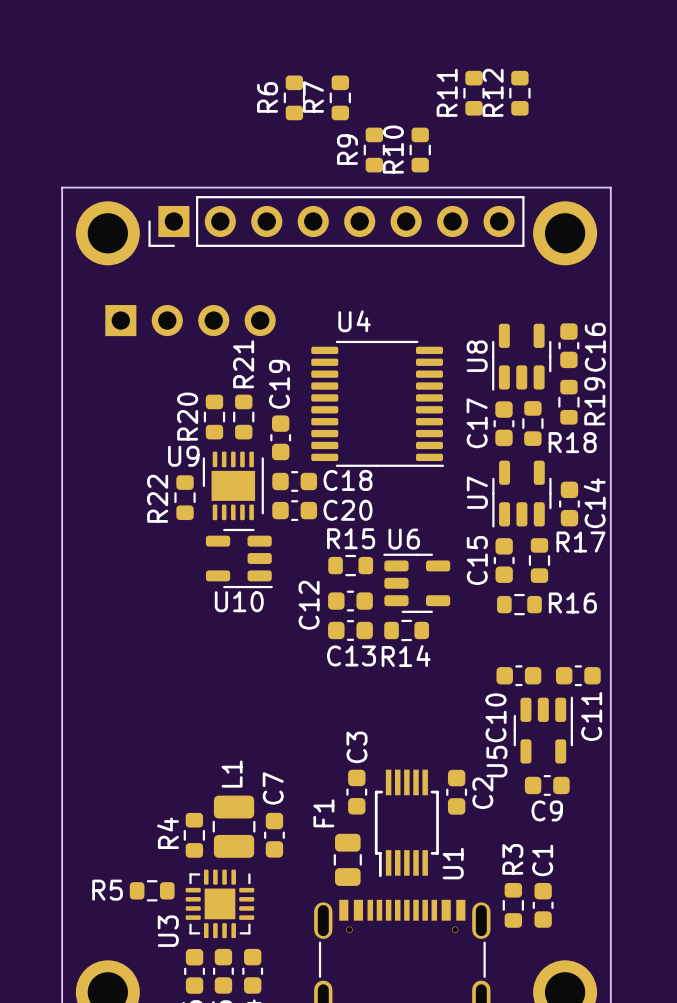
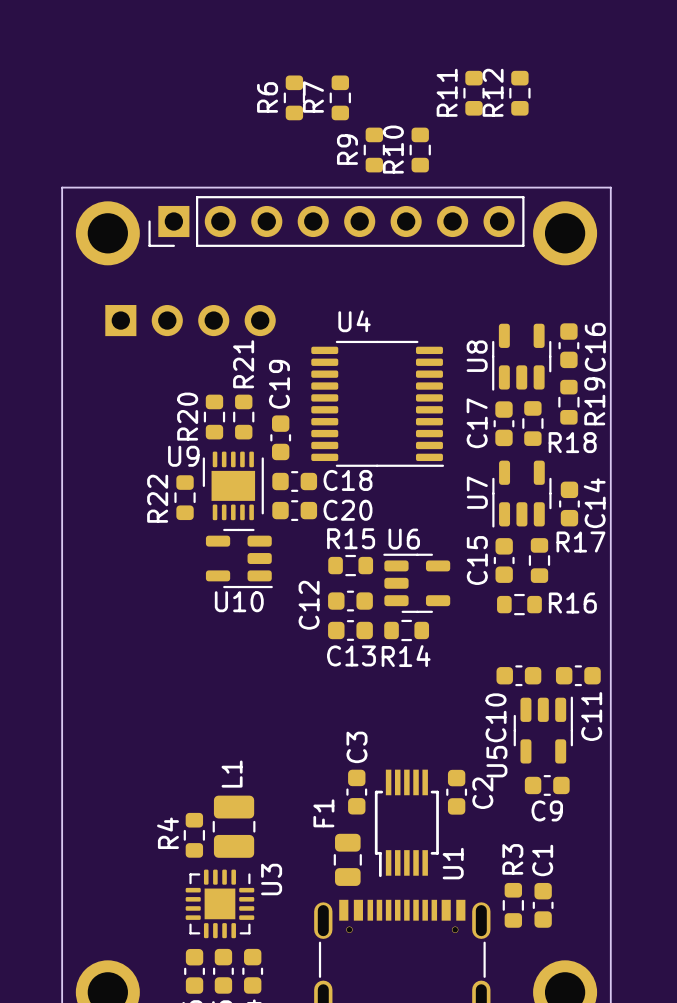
C7: (274, 835) -> none
R5: (152, 890) -> none
U3 name position: U3 (168, 931) -> U3 (271, 879)

